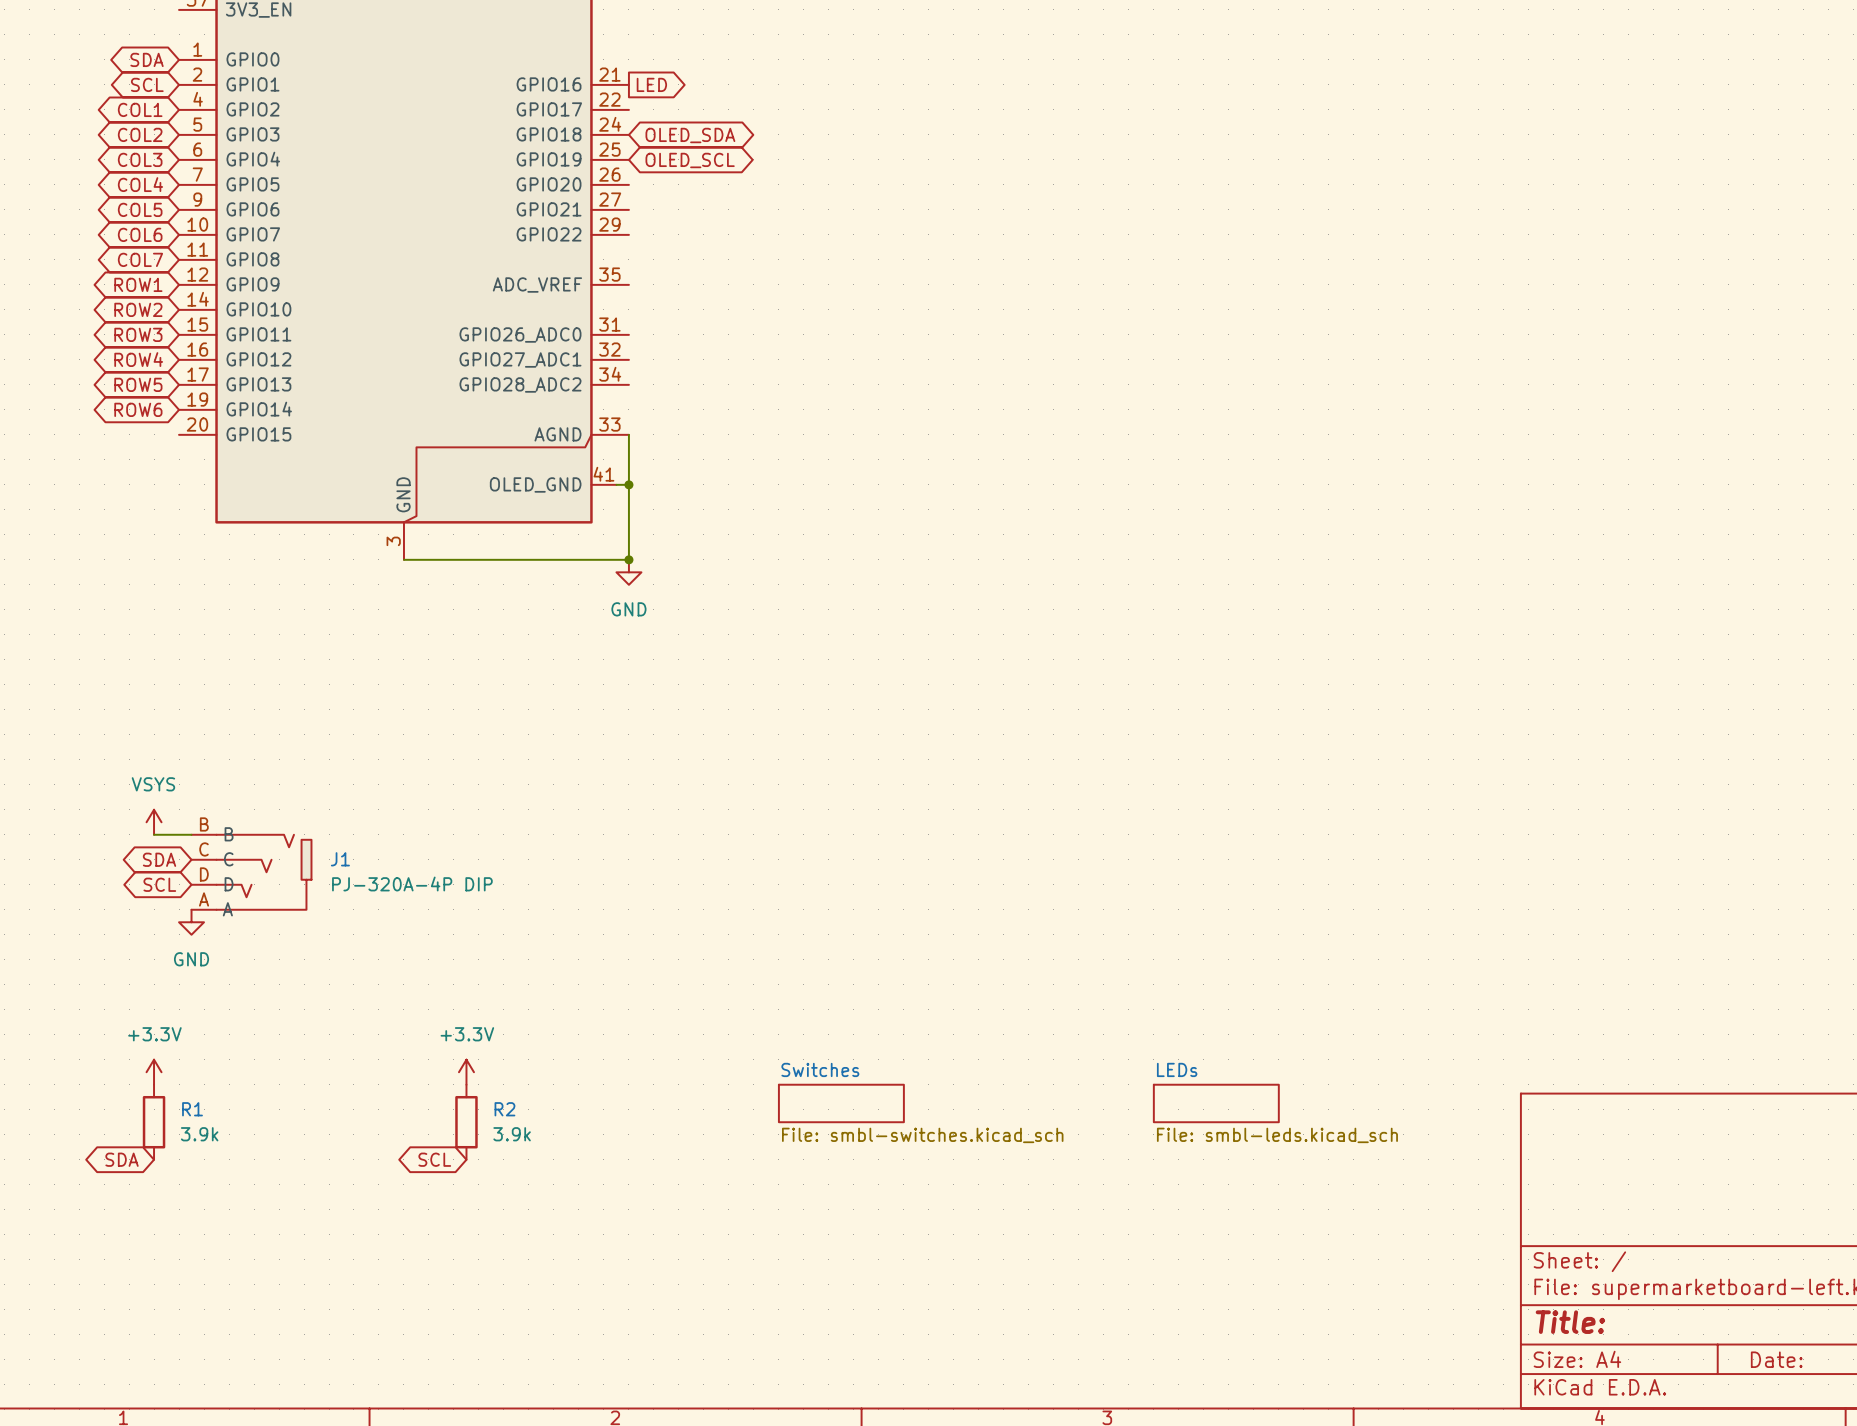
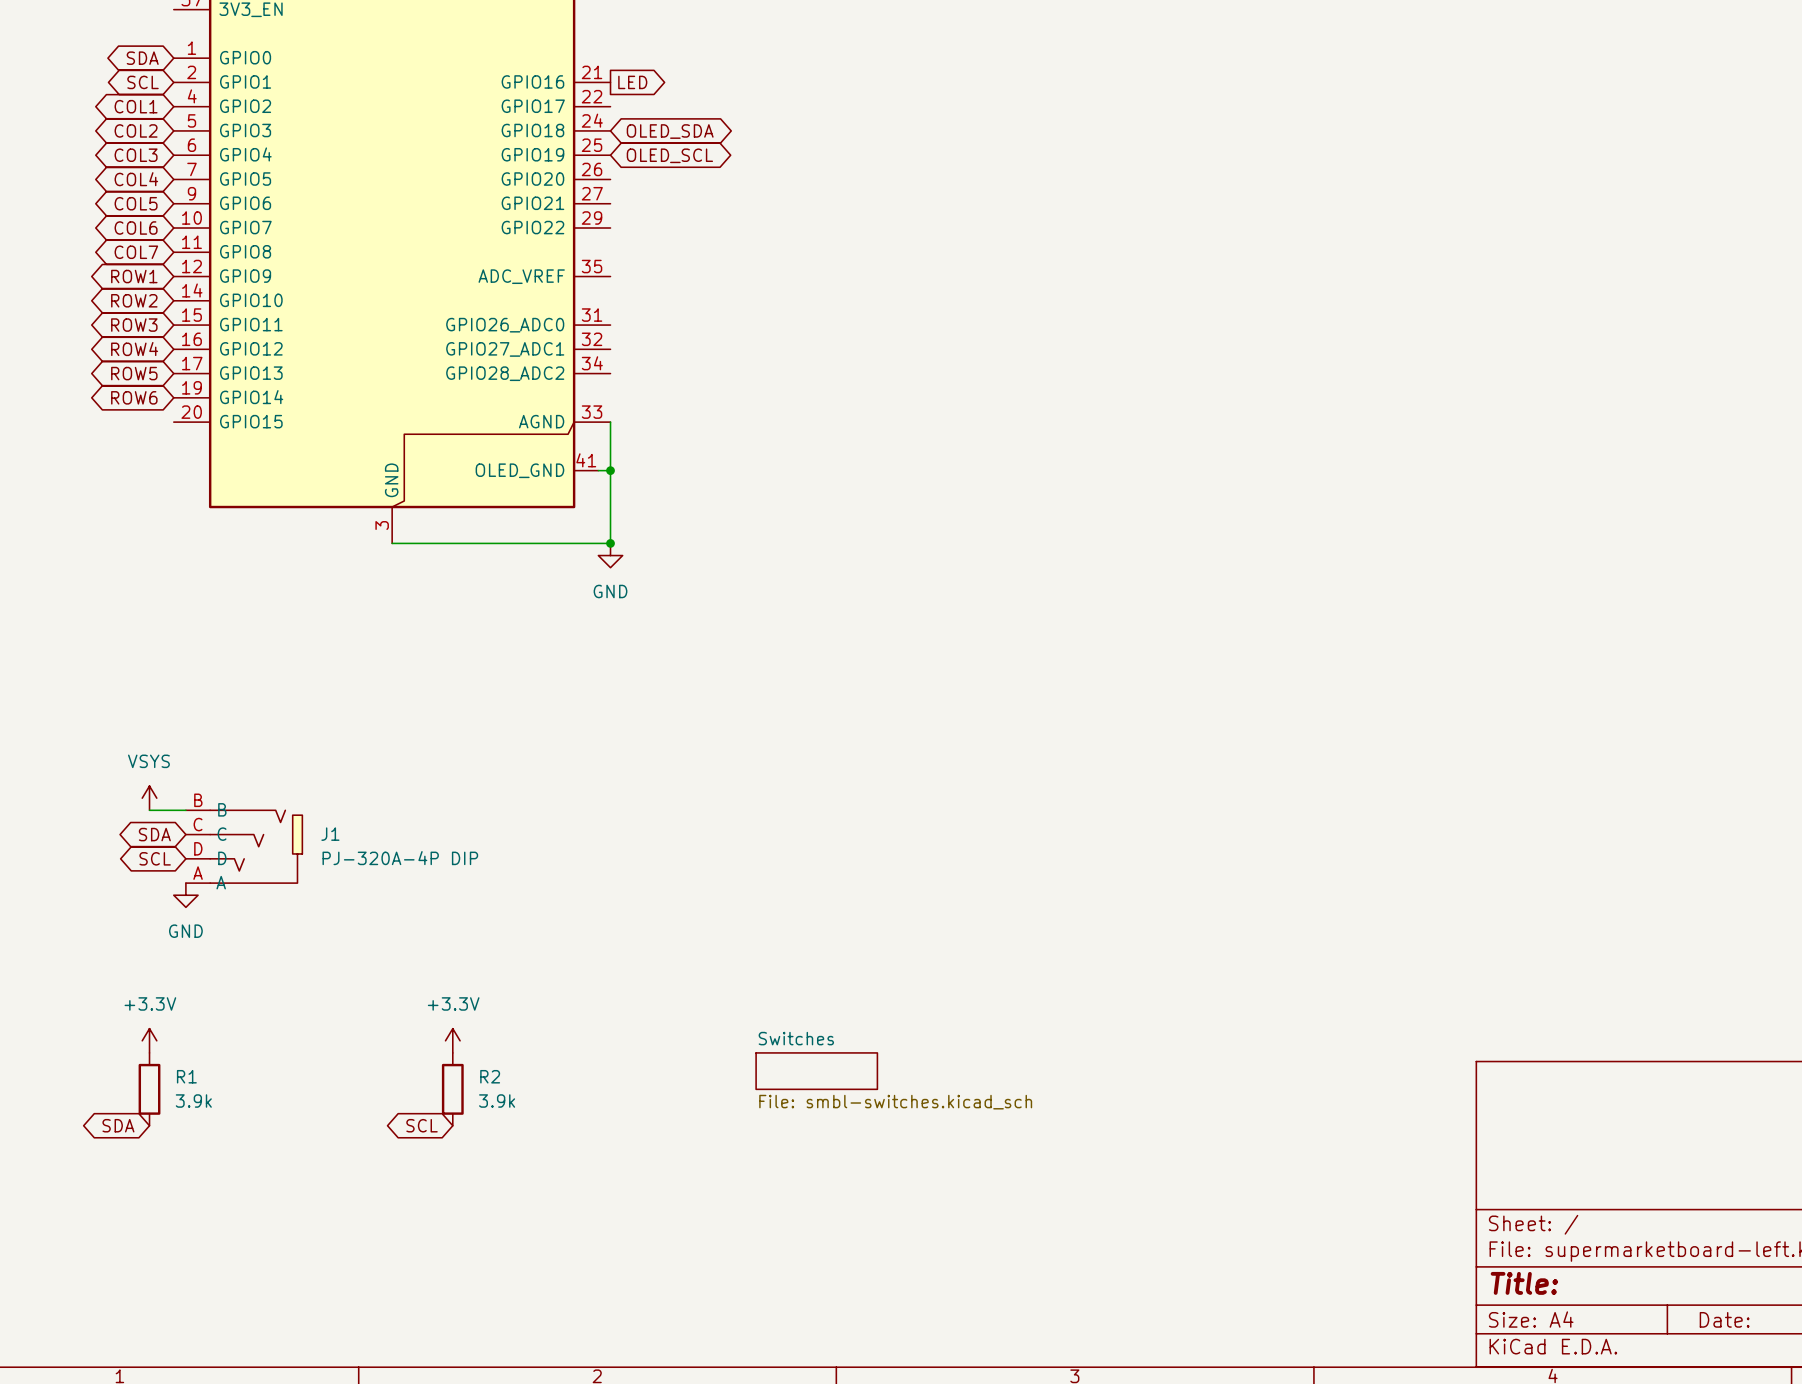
sheet LEDs: File: smbl-leds.kicad_sch (1216, 1103) -> none

